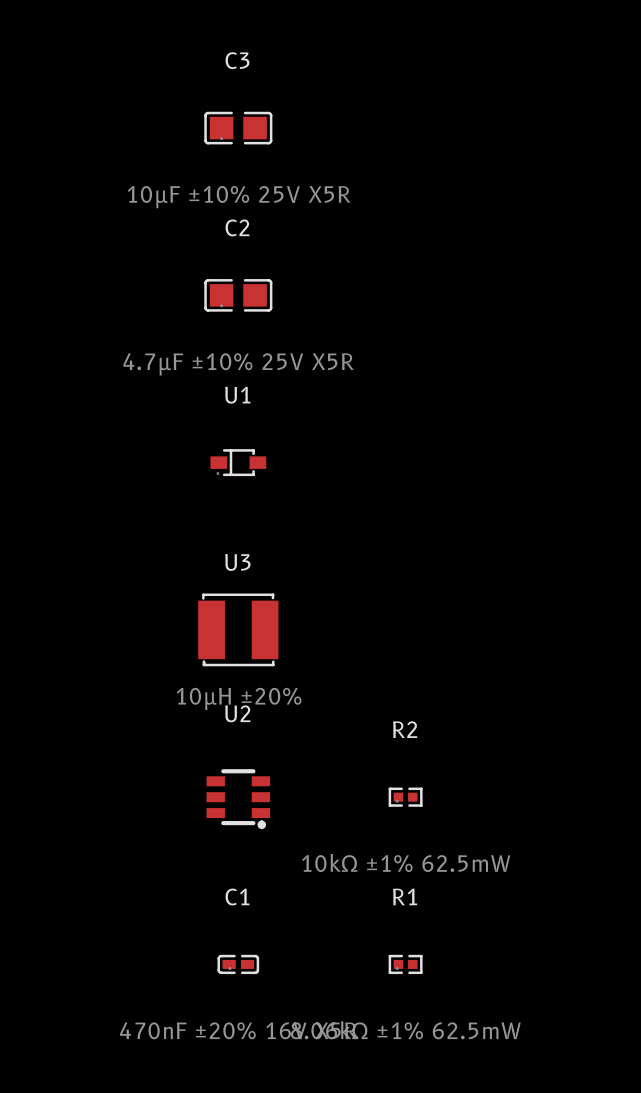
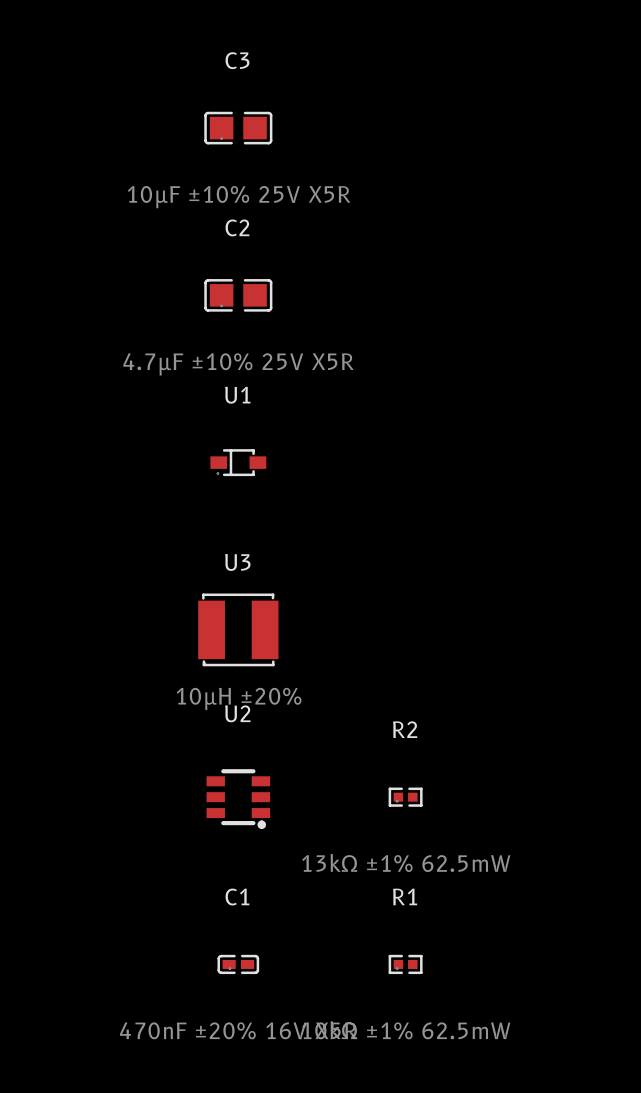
R2 value: 10kΩ ±1% 62.5mW (406, 863) -> 13kΩ ±1% 62.5mW (406, 863)
R1 value: 8.06kΩ ±1% 62.5mW (405, 1030) -> 10kΩ ±1% 62.5mW (406, 1030)

